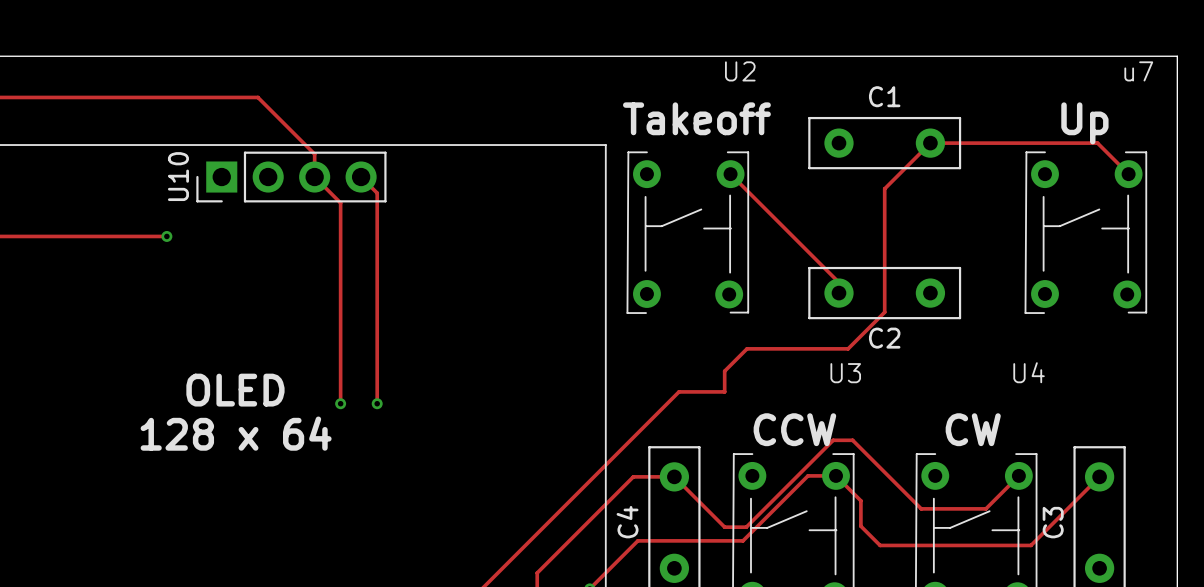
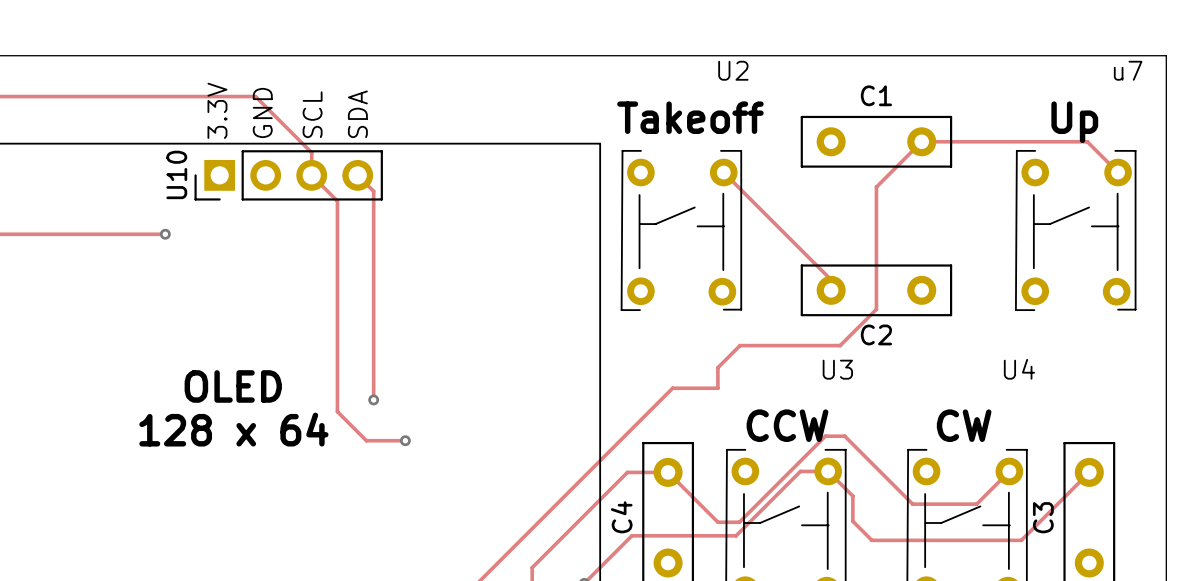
text: none -> 3.3V (217, 110)
text: none -> GND (262, 112)
text: none -> SCL (312, 114)
text: none -> SDA (357, 114)
track: none -> (337, 399) (337, 411) (366, 440) (405, 440)
via position: (340, 403) -> (405, 440)

